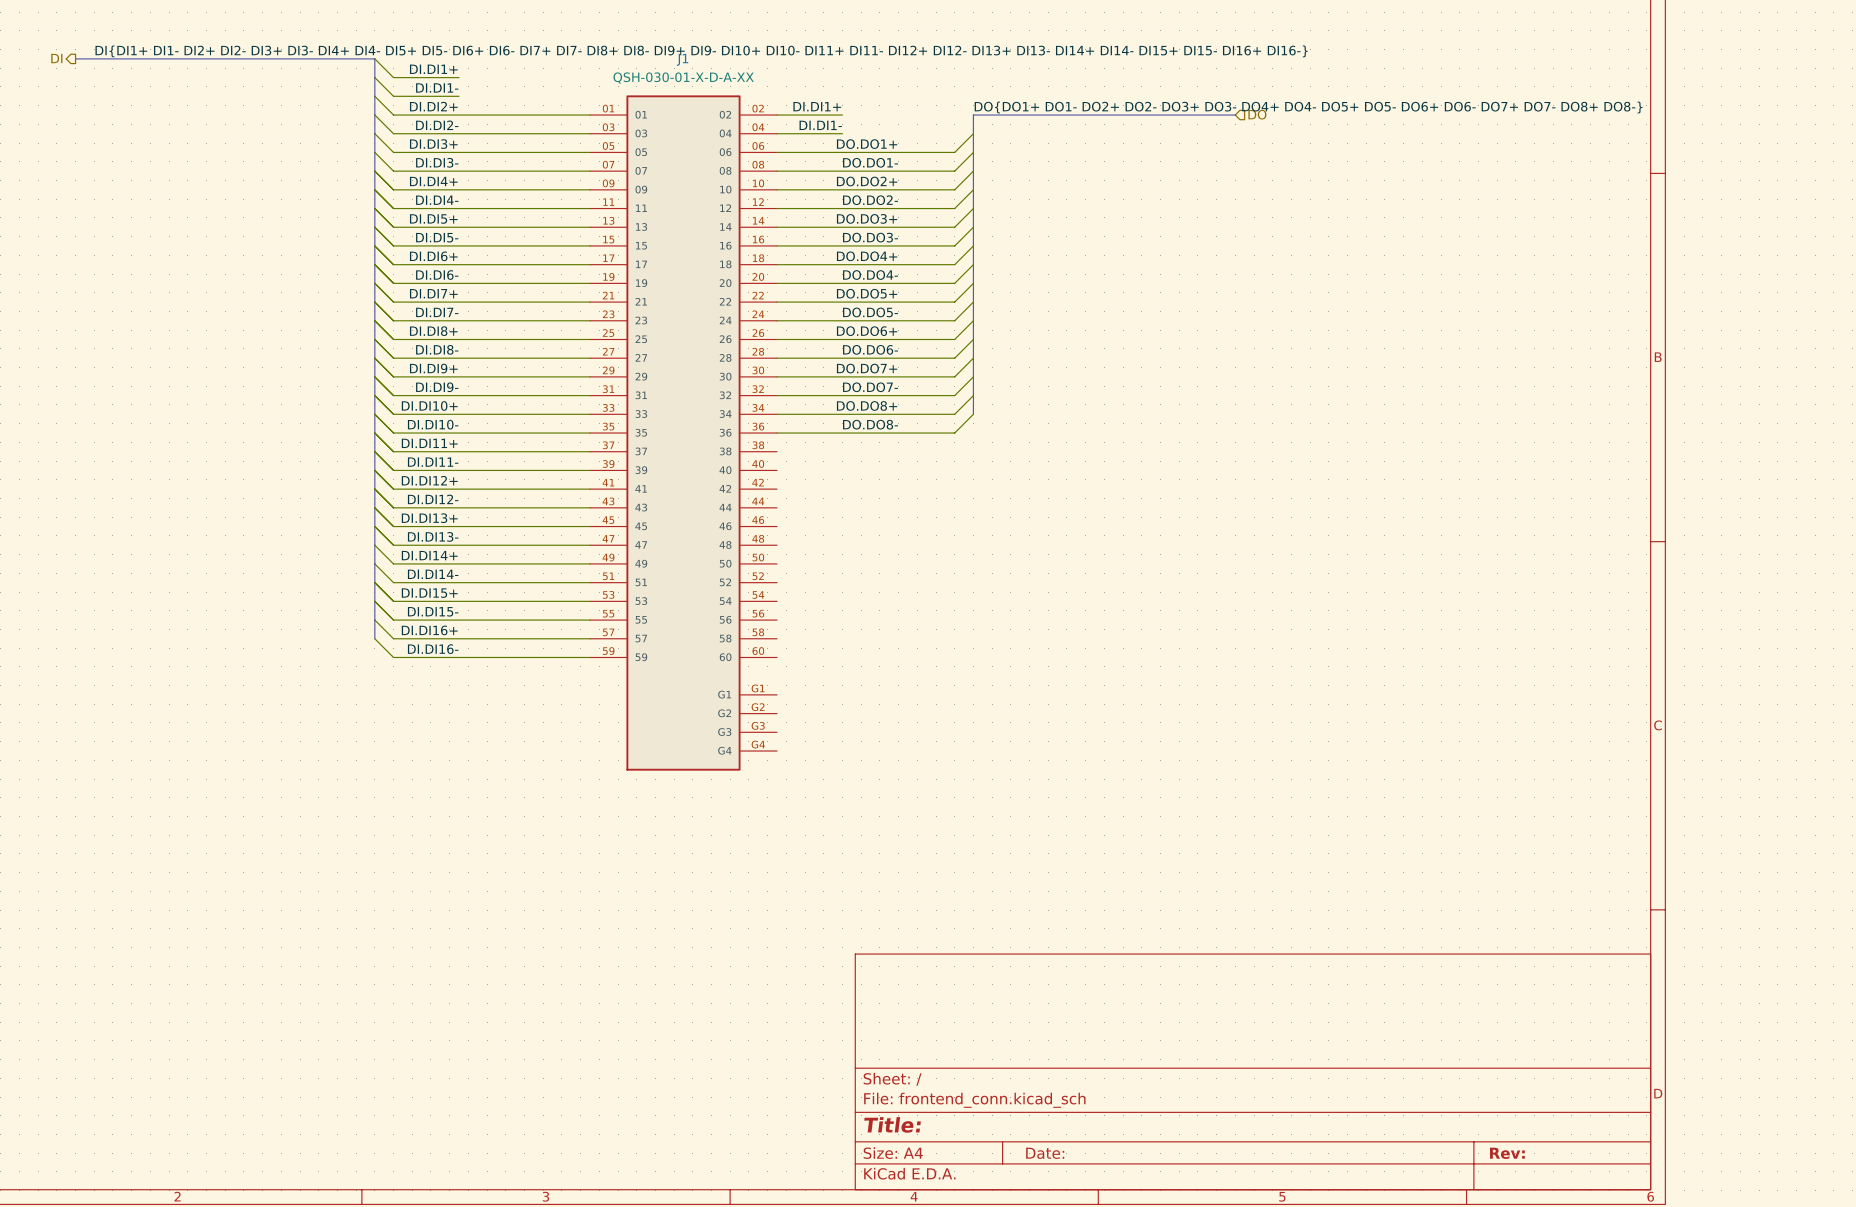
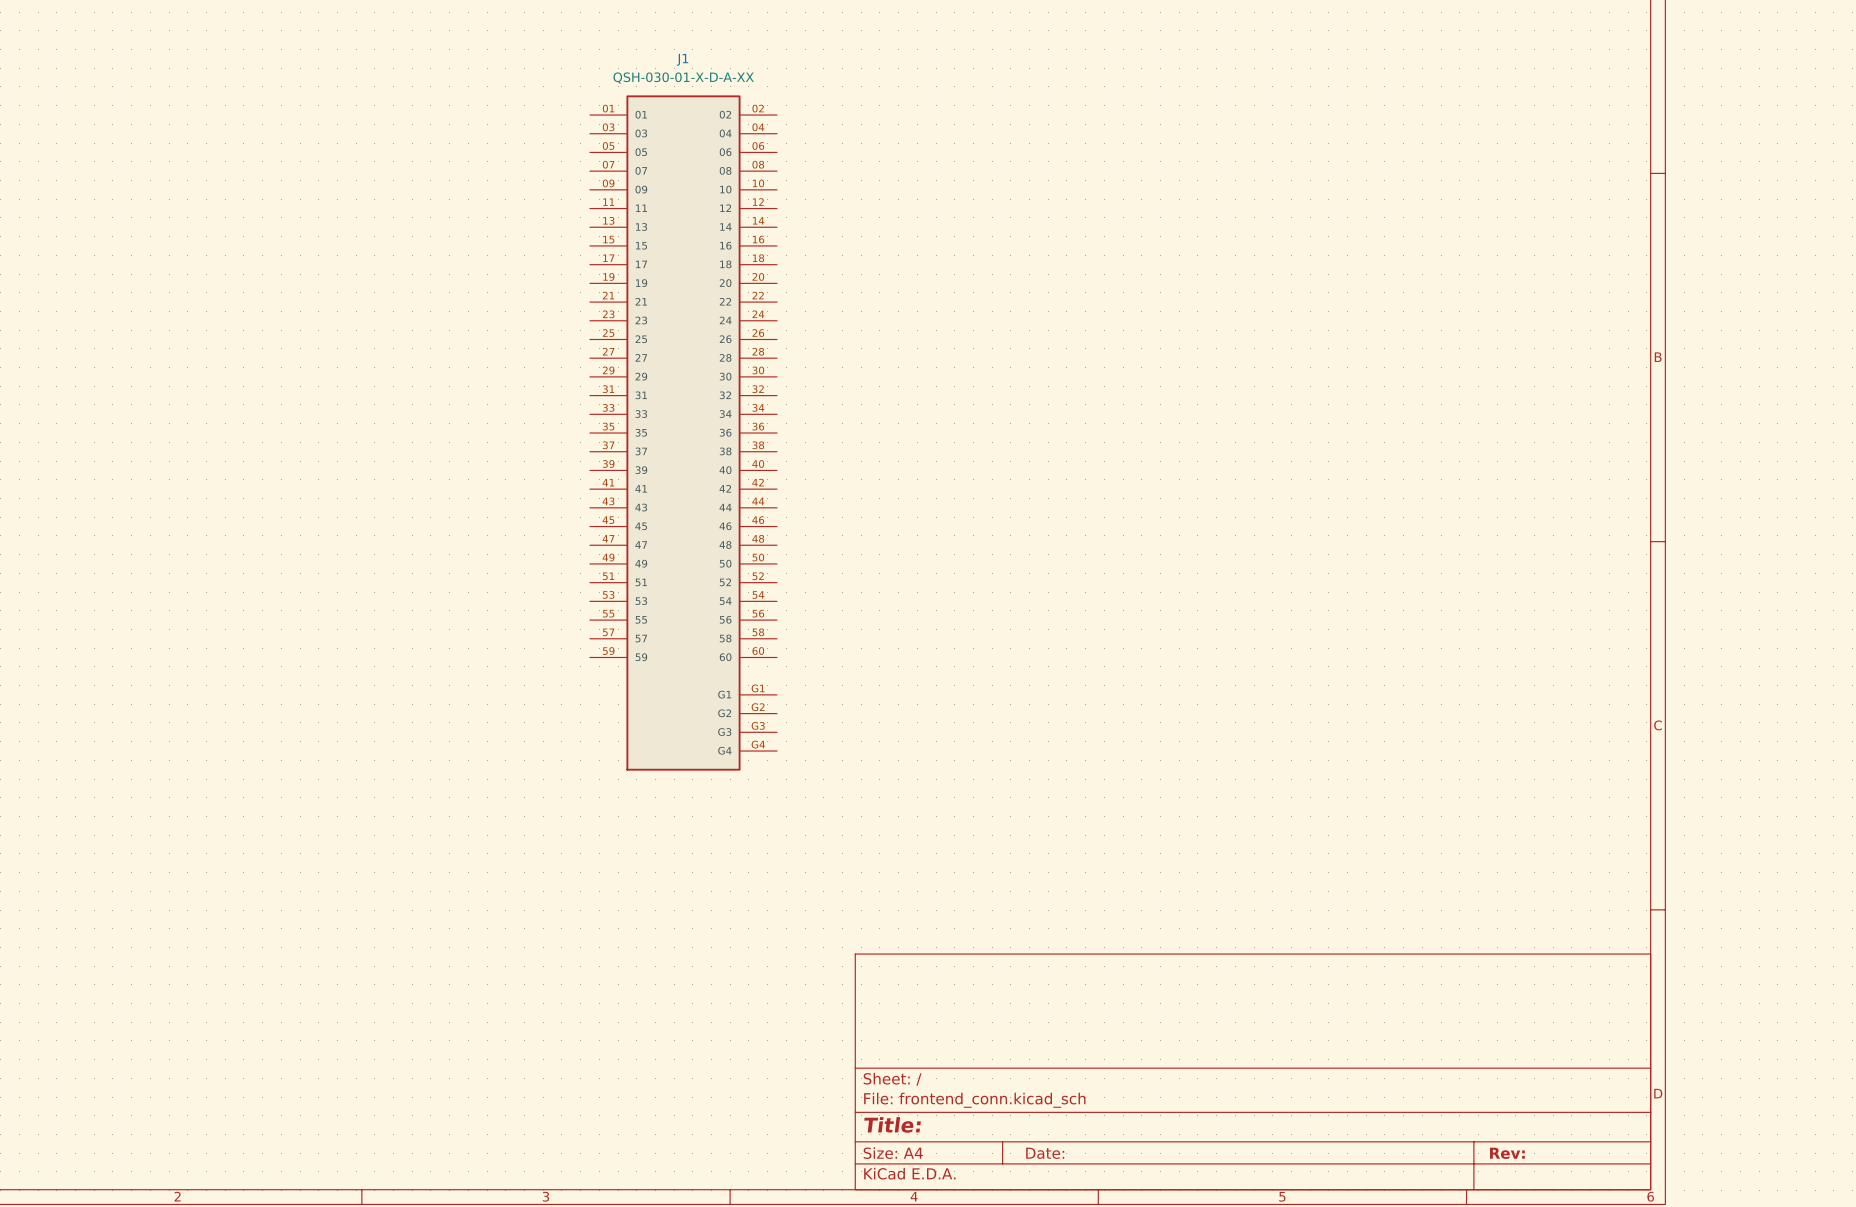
label: DI{DI1+ DI1- DI2+ DI2- DI3+ DI3- DI4+ DI4- DI5+ DI5- DI6+ DI6- DI7+ DI7- DI8+ DI8- DI9+ DI9- DI10+ DI10- DI11+ DI11- DI12+ DI12- DI13+ DI13- DI14+ DI14- DI15+ DI15- DI16+ DI16-} (701, 51) -> none
hierarchical label: DI (56, 58) -> none
bus: (75, 58) (374, 58) (374, 638) -> none
wire: (374, 58) (393, 77) (459, 77) -> none
label: DI.DI1+ (433, 69) -> none
wire: (374, 77) (393, 96) (459, 96) -> none
label: DI.DI1- (437, 87) -> none
wire: (374, 96) (393, 115) (589, 115) -> none
label: DI.DI2+ (433, 106) -> none
label: DI.DI1+ (817, 106) -> none
label: DO{DO1+ DO1- DO2+ DO2- DO3+ DO3- DO4+ DO4- DO5+ DO5- DO6+ DO6- DO7+ DO7- DO8+ DO8-} (1308, 107) -> none
hierarchical label: DO (1257, 114) -> none
wire: (374, 115) (393, 133) (589, 133) -> none
wire: (777, 115) (842, 115) -> none
bus: (1235, 115) (973, 115) (973, 414) -> none
label: DI.DI2- (437, 125) -> none
label: DI.DI1- (820, 125) -> none
wire: (374, 133) (393, 152) (589, 152) -> none
wire: (777, 133) (842, 133) -> none
wire: (973, 133) (954, 152) (777, 152) -> none
label: DI.DI3+ (433, 144) -> none
label: DO.DO1+ (867, 144) -> none
wire: (374, 152) (393, 171) (589, 171) -> none
wire: (973, 152) (954, 171) (777, 171) -> none
label: DI.DI3- (437, 162) -> none
label: DO.DO1- (870, 162) -> none
wire: (374, 171) (393, 189) (589, 189) -> none
wire: (973, 171) (954, 189) (777, 189) -> none
label: DI.DI4+ (433, 181) -> none
label: DO.DO2+ (867, 181) -> none
wire: (374, 189) (393, 208) (589, 208) -> none
wire: (973, 189) (954, 208) (777, 208) -> none
label: DI.DI4- (437, 200) -> none
label: DO.DO2- (870, 200) -> none
wire: (374, 208) (393, 227) (589, 227) -> none
wire: (973, 208) (954, 227) (777, 227) -> none
label: DO.DO3+ (867, 218) -> none
label: DI.DI5+ (433, 219) -> none
wire: (374, 227) (393, 245) (589, 245) -> none
wire: (973, 227) (954, 245) (777, 245) -> none
label: DI.DI5- (437, 237) -> none
label: DO.DO3- (870, 237) -> none
wire: (374, 245) (393, 264) (589, 264) -> none
wire: (973, 245) (954, 264) (777, 264) -> none
label: DI.DI6+ (433, 256) -> none
label: DO.DO4+ (867, 256) -> none
wire: (374, 264) (393, 283) (589, 283) -> none
wire: (973, 264) (954, 283) (777, 283) -> none
label: DI.DI6- (437, 275) -> none
label: DO.DO4- (870, 275) -> none
wire: (374, 283) (393, 302) (589, 302) -> none
wire: (973, 283) (954, 302) (777, 302) -> none
label: DI.DI7+ (433, 293) -> none
label: DO.DO5+ (867, 293) -> none
wire: (374, 302) (393, 320) (589, 320) -> none
wire: (973, 302) (954, 320) (777, 320) -> none
label: DI.DI7- (437, 312) -> none
label: DO.DO5- (870, 312) -> none
wire: (374, 320) (393, 339) (589, 339) -> none
wire: (973, 320) (954, 339) (777, 339) -> none
label: DI.DI8+ (433, 331) -> none
label: DO.DO6+ (867, 331) -> none
wire: (374, 339) (393, 358) (589, 358) -> none
wire: (973, 339) (954, 358) (777, 358) -> none
label: DI.DI8- (437, 349) -> none
label: DO.DO6- (870, 349) -> none
wire: (374, 358) (393, 376) (589, 376) -> none
wire: (973, 358) (954, 376) (777, 376) -> none
label: DI.DI9+ (433, 368) -> none
label: DO.DO7+ (867, 368) -> none
wire: (374, 376) (393, 395) (589, 395) -> none
wire: (973, 376) (954, 395) (777, 395) -> none
label: DI.DI9- (437, 387) -> none
label: DO.DO7- (870, 387) -> none
wire: (374, 395) (393, 414) (589, 414) -> none
wire: (973, 395) (954, 414) (777, 414) -> none
label: DI.DI10+ (429, 405) -> none
label: DO.DO8+ (867, 405) -> none
wire: (374, 414) (393, 433) (589, 433) -> none
wire: (973, 414) (954, 433) (777, 433) -> none
label: DI.DI10- (433, 424) -> none
label: DO.DO8- (870, 424) -> none
wire: (374, 433) (393, 451) (589, 451) -> none
label: DI.DI11+ (429, 443) -> none
wire: (374, 451) (393, 470) (589, 470) -> none
label: DI.DI11- (433, 462) -> none
wire: (374, 470) (393, 489) (589, 489) -> none
label: DI.DI12+ (429, 480) -> none
wire: (374, 489) (393, 507) (589, 507) -> none
label: DI.DI12- (433, 499) -> none
wire: (374, 507) (393, 526) (589, 526) -> none
label: DI.DI13+ (429, 518) -> none
wire: (374, 526) (393, 545) (589, 545) -> none
label: DI.DI13- (433, 536) -> none
wire: (374, 545) (393, 563) (589, 563) -> none
label: DI.DI14+ (429, 555) -> none
wire: (374, 563) (393, 582) (589, 582) -> none
label: DI.DI14- (433, 574) -> none
wire: (374, 582) (393, 601) (589, 601) -> none
label: DI.DI15+ (429, 593) -> none
wire: (374, 601) (393, 620) (589, 620) -> none
label: DI.DI15- (433, 611) -> none
wire: (374, 620) (393, 638) (589, 638) -> none
label: DI.DI16+ (429, 630) -> none
wire: (374, 638) (393, 657) (589, 657) -> none
label: DI.DI16- (433, 649) -> none

